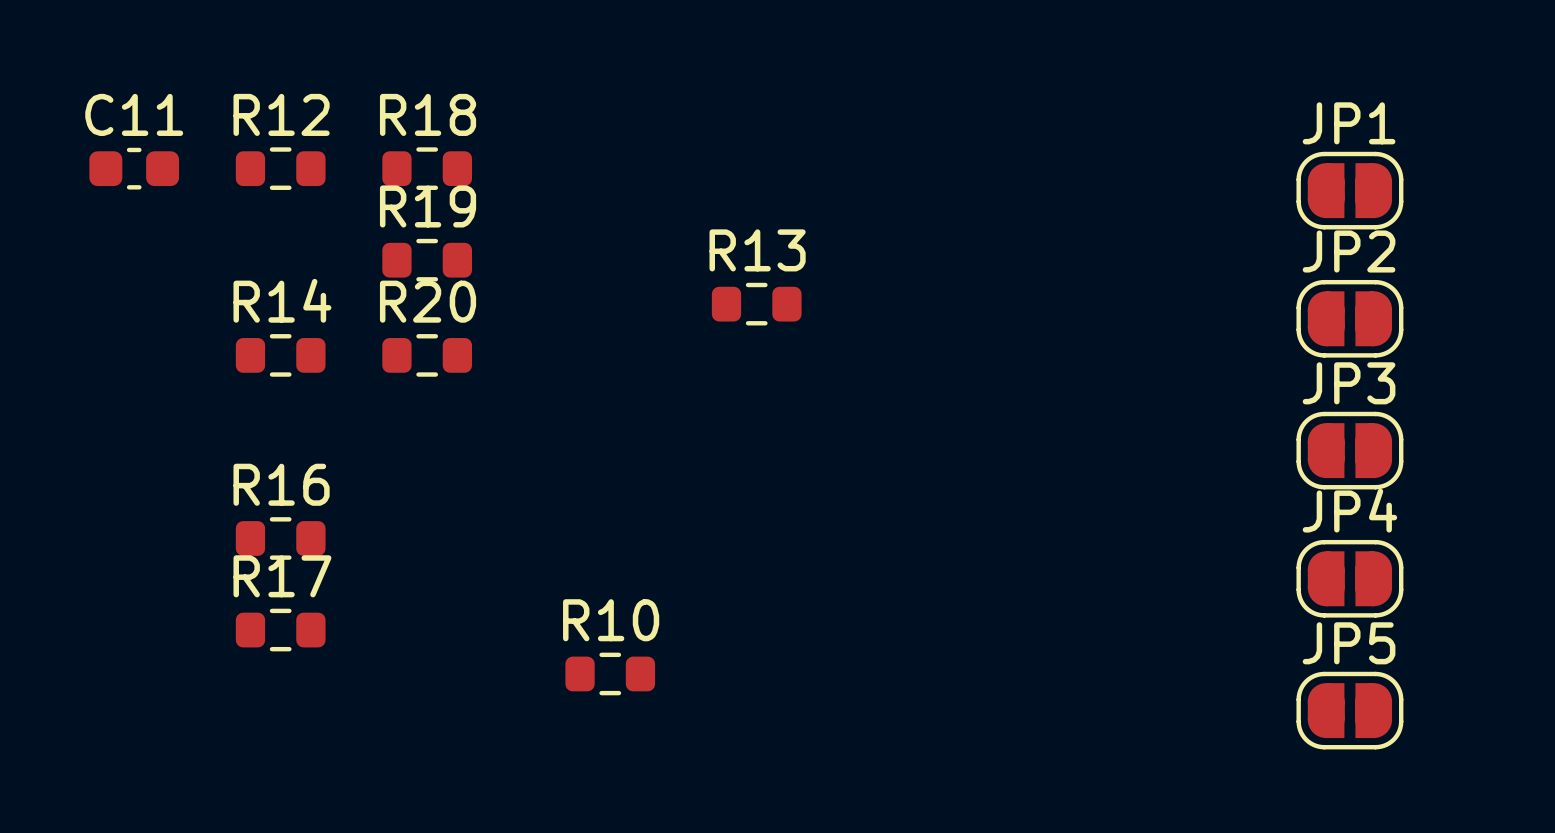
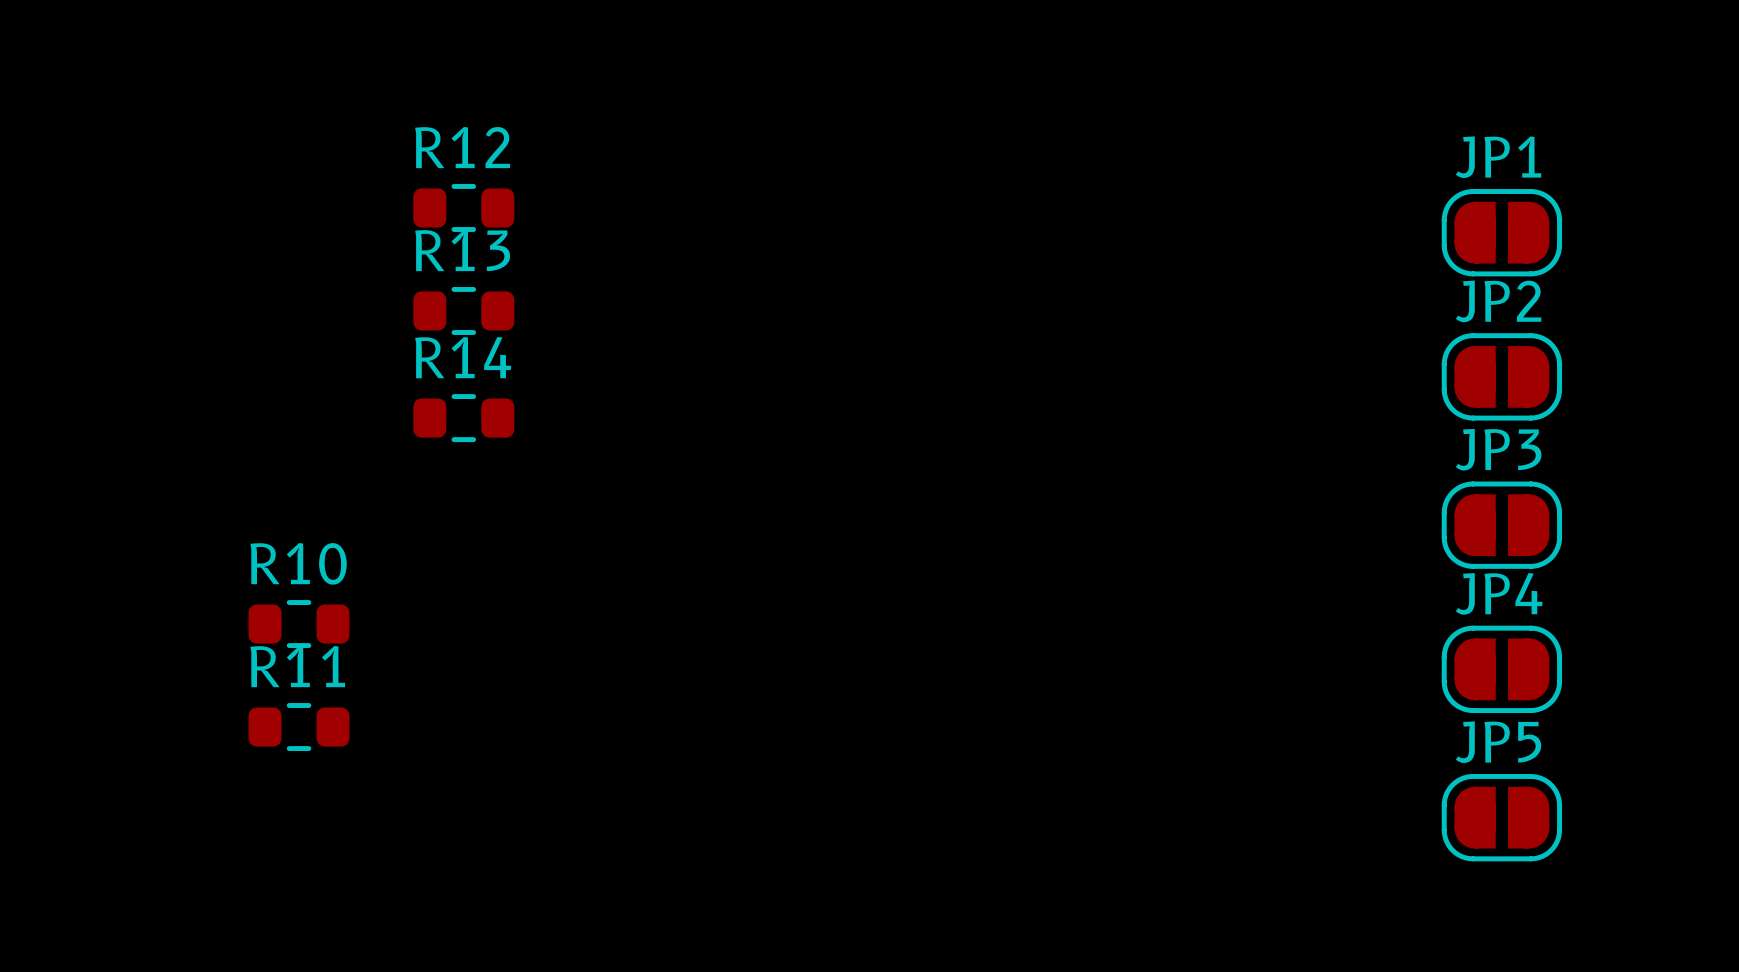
R18 name: R18 (428, 114) -> R12 (462, 147)
C11: (134, 168) -> none
R12: (280, 168) -> none
R19 name: R19 (428, 206) -> R13 (462, 250)
R20 name: R20 (428, 301) -> R14 (463, 357)
R13: (756, 304) -> none
R14: (280, 355) -> none
R16 name: R16 (281, 484) -> R10 (298, 563)
R17 name: R17 (282, 576) -> R11 (297, 666)
R10: (610, 673) -> none

